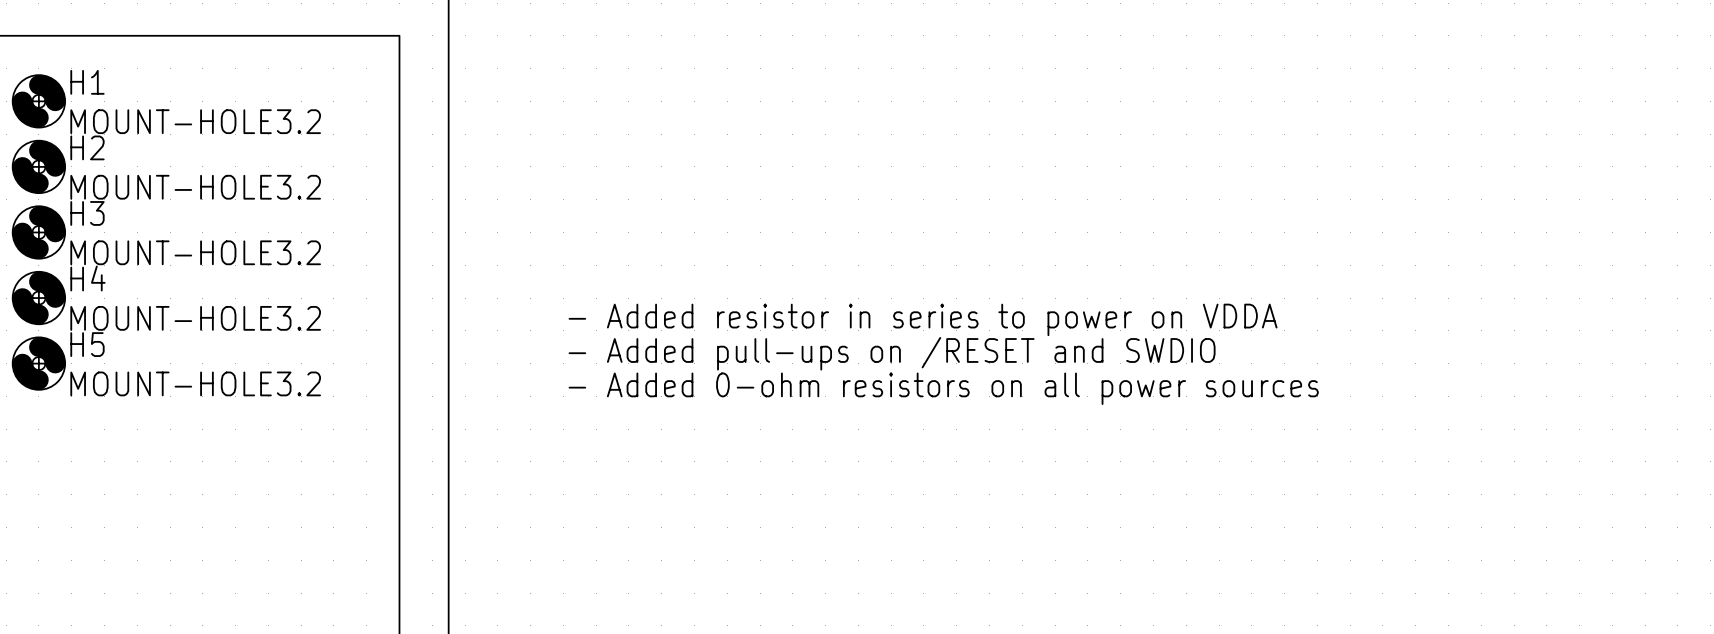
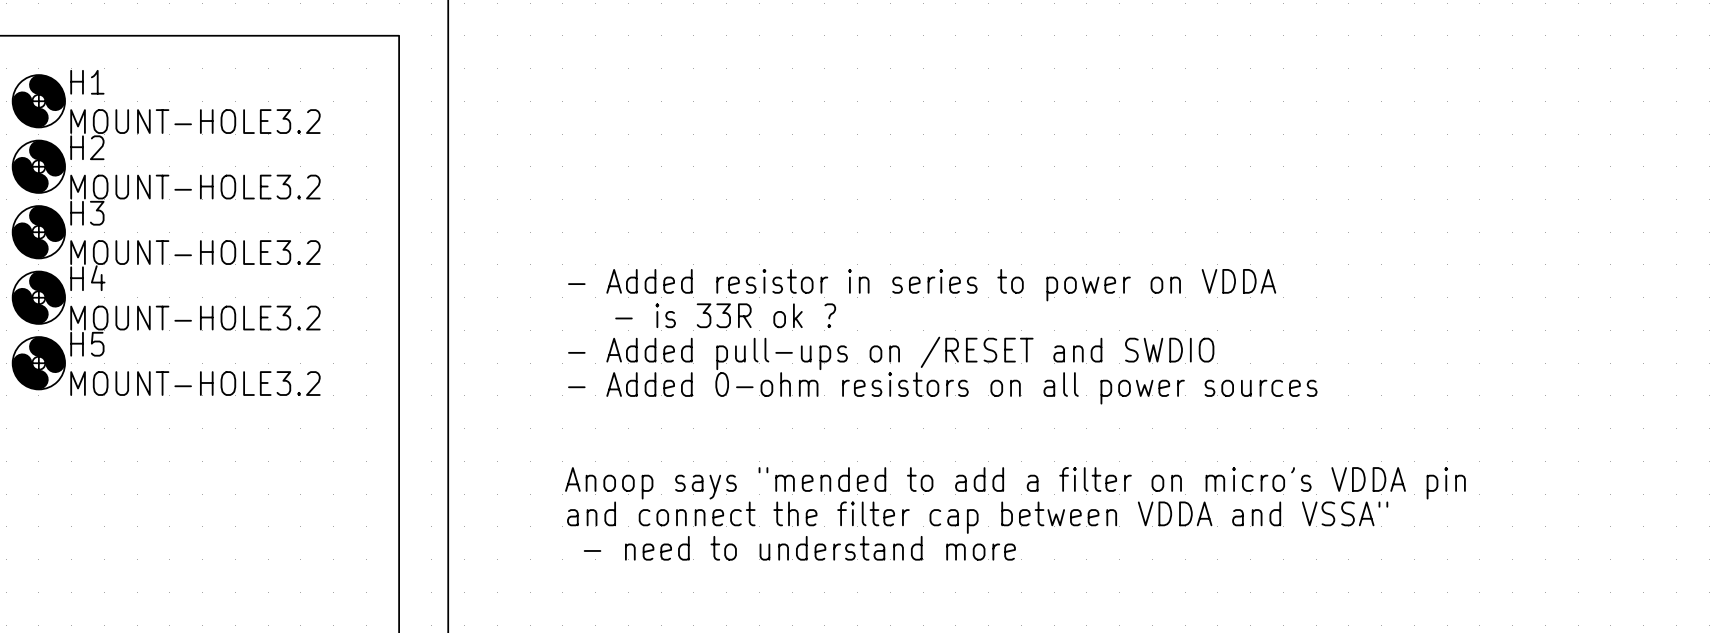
text: none -> - Added resistor in series to power on VDDA (922, 285)
text: - Added resistor in series to power on VDDA (923, 319) -> - is 33R ok ? (725, 315)
text: none -> Anoop says "mended to add a filter on micro’s VDDA pin (1015, 483)
text: none -> and connect the filter cap between VDDA and VSSA" (977, 517)
text: none -> - need to understand more (799, 548)

